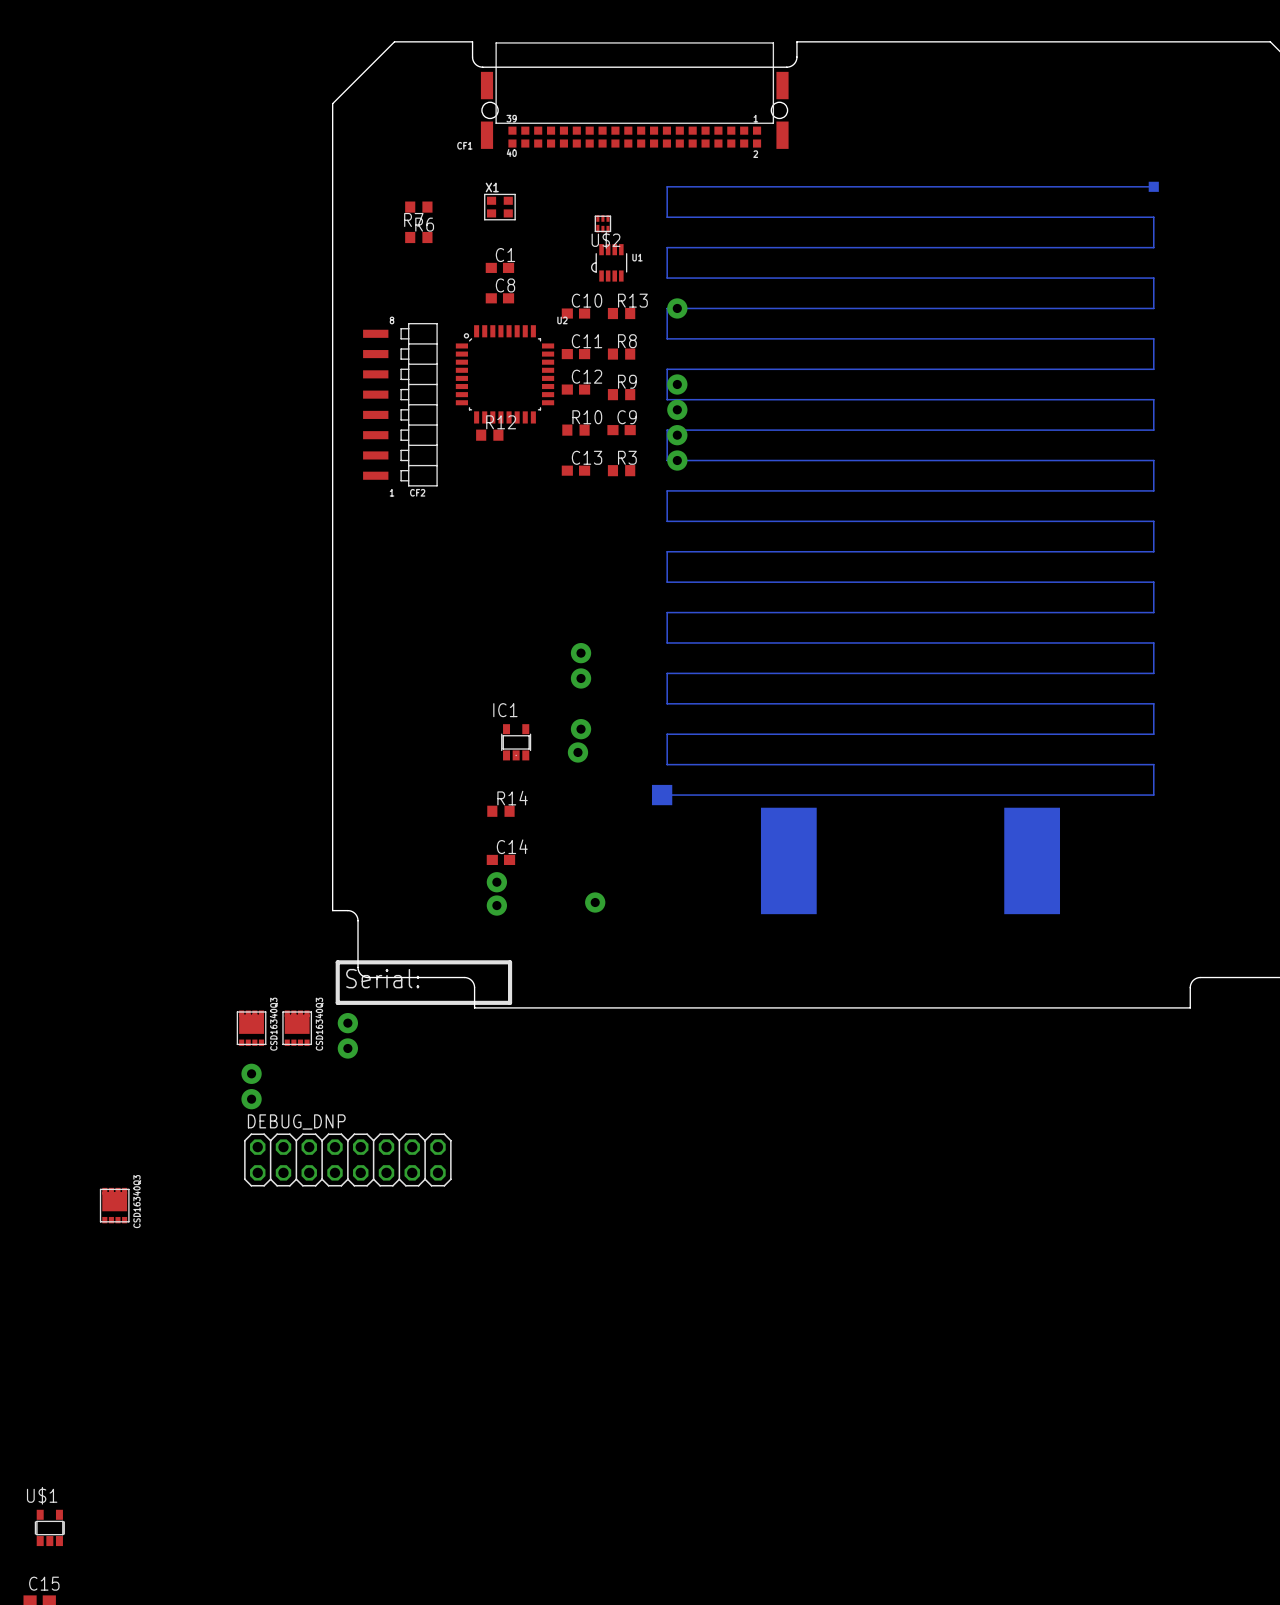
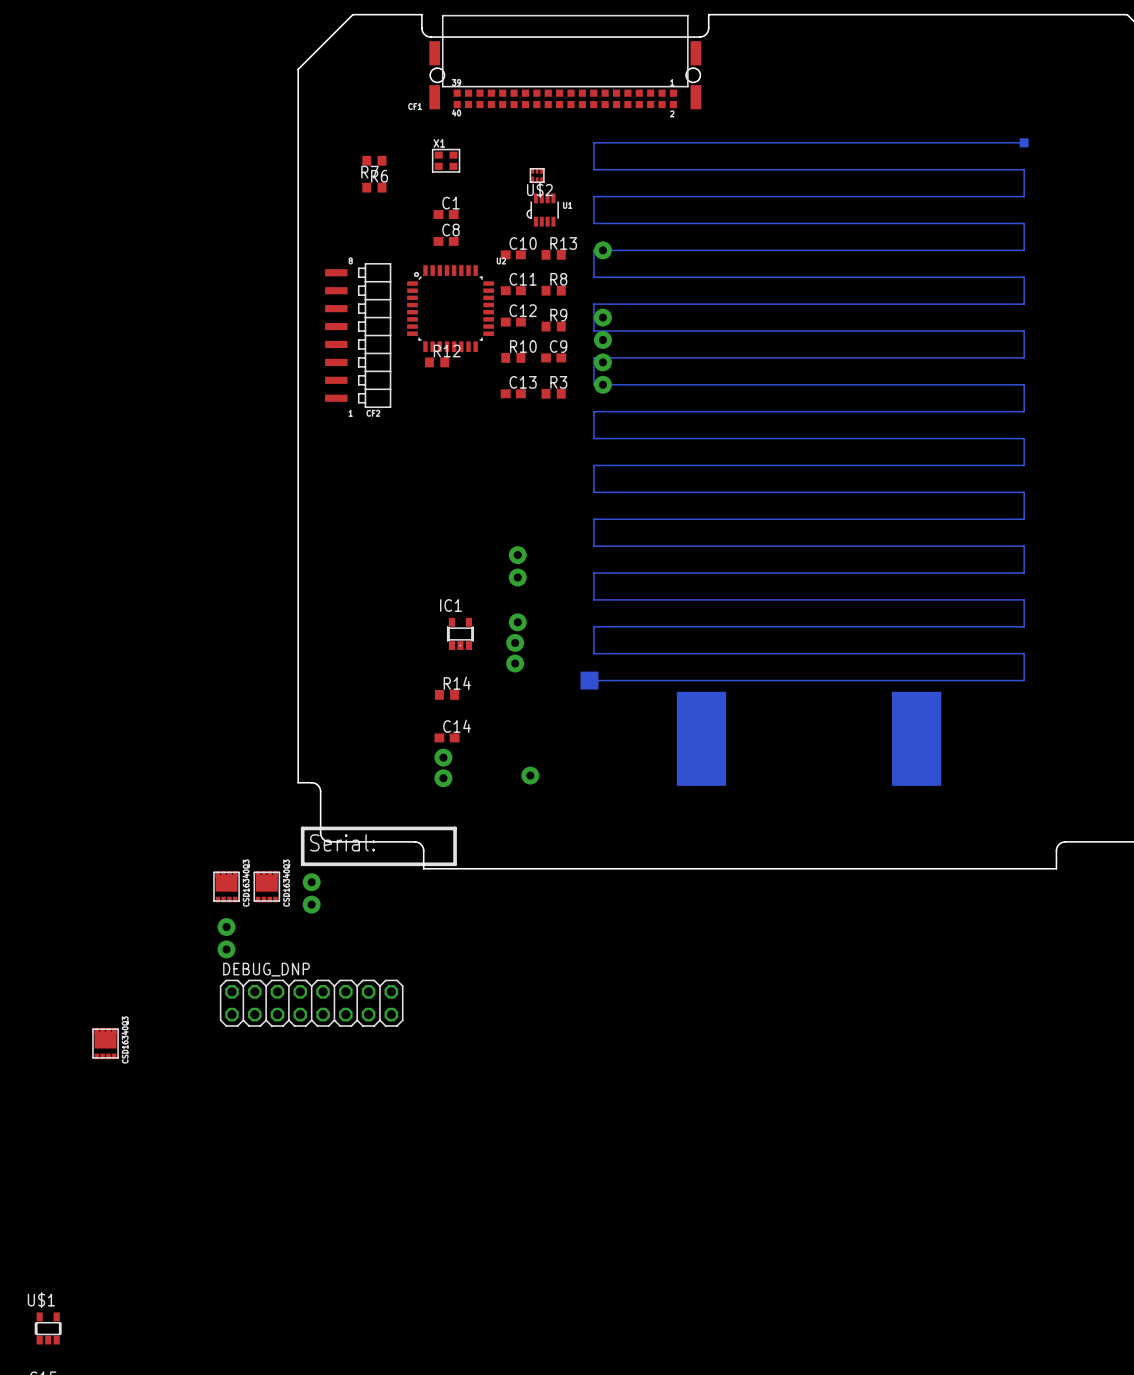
part: none -> (515, 663)

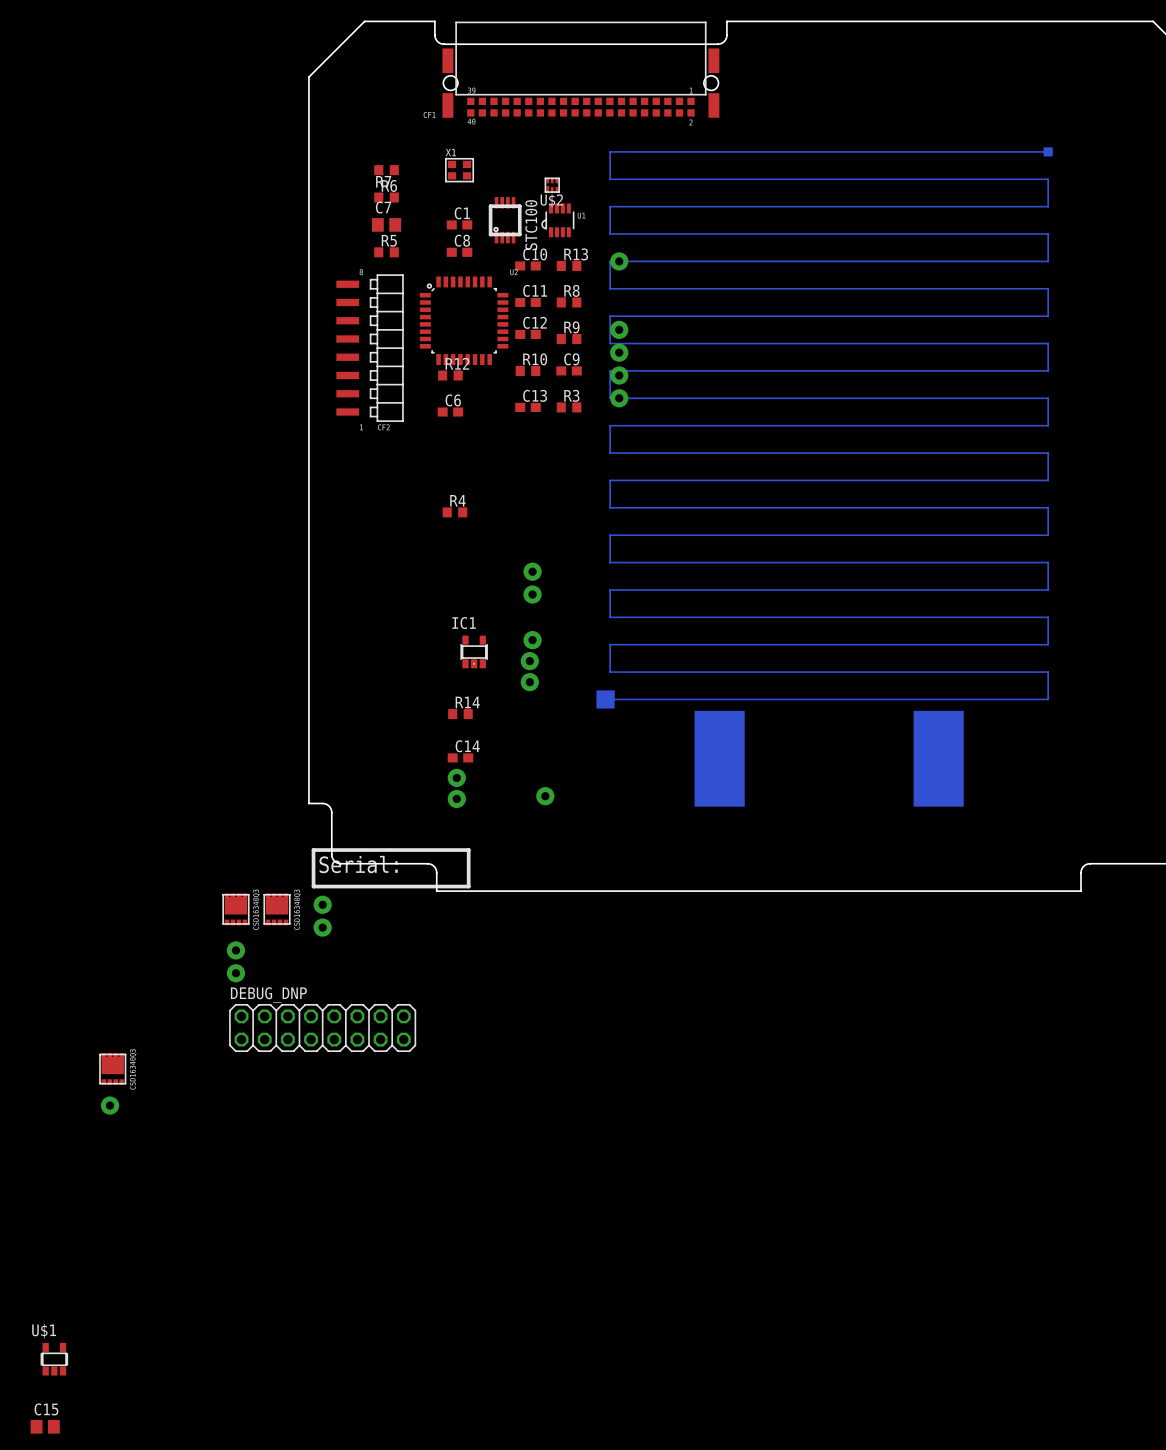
part: none -> (505, 220)
C7: none -> (386, 224)
R5: none -> (386, 252)
C6: none -> (450, 411)
R4: none -> (454, 512)
part: none -> (110, 1105)

